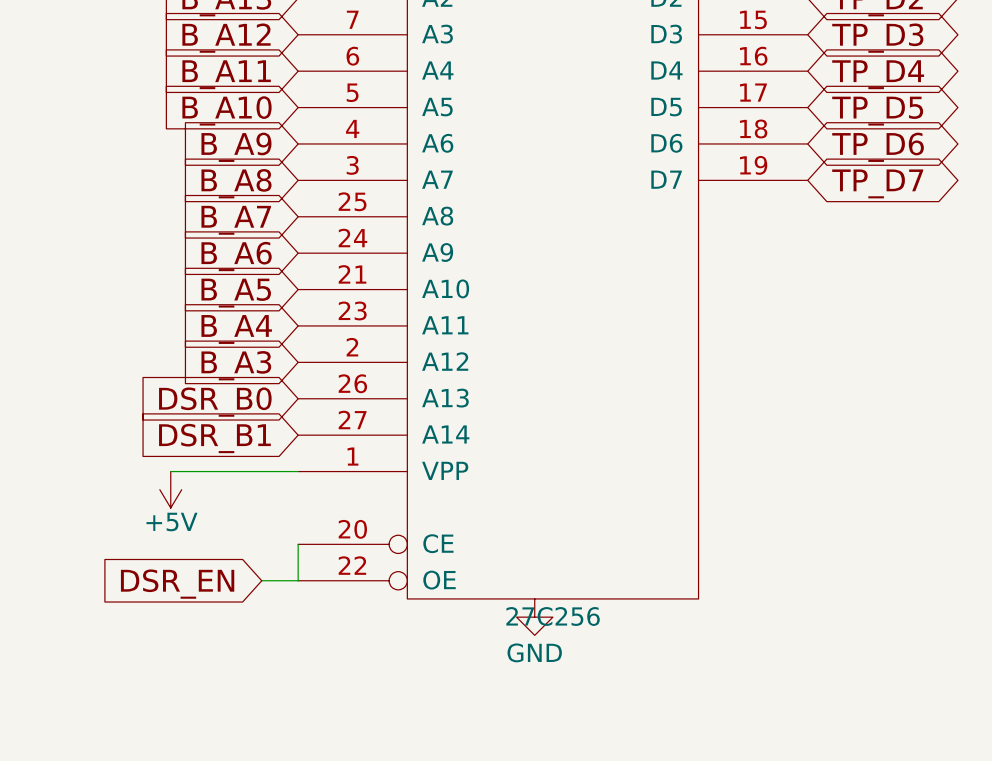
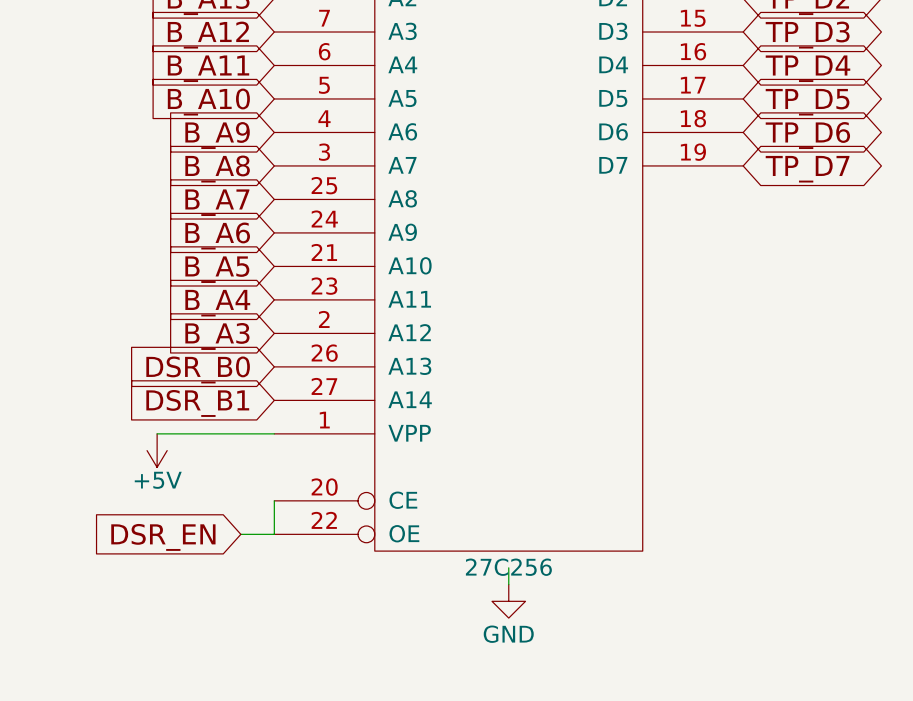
power symbol position: GND (534, 617) -> GND (508, 601)
wire: none -> (508, 567) (508, 584)

